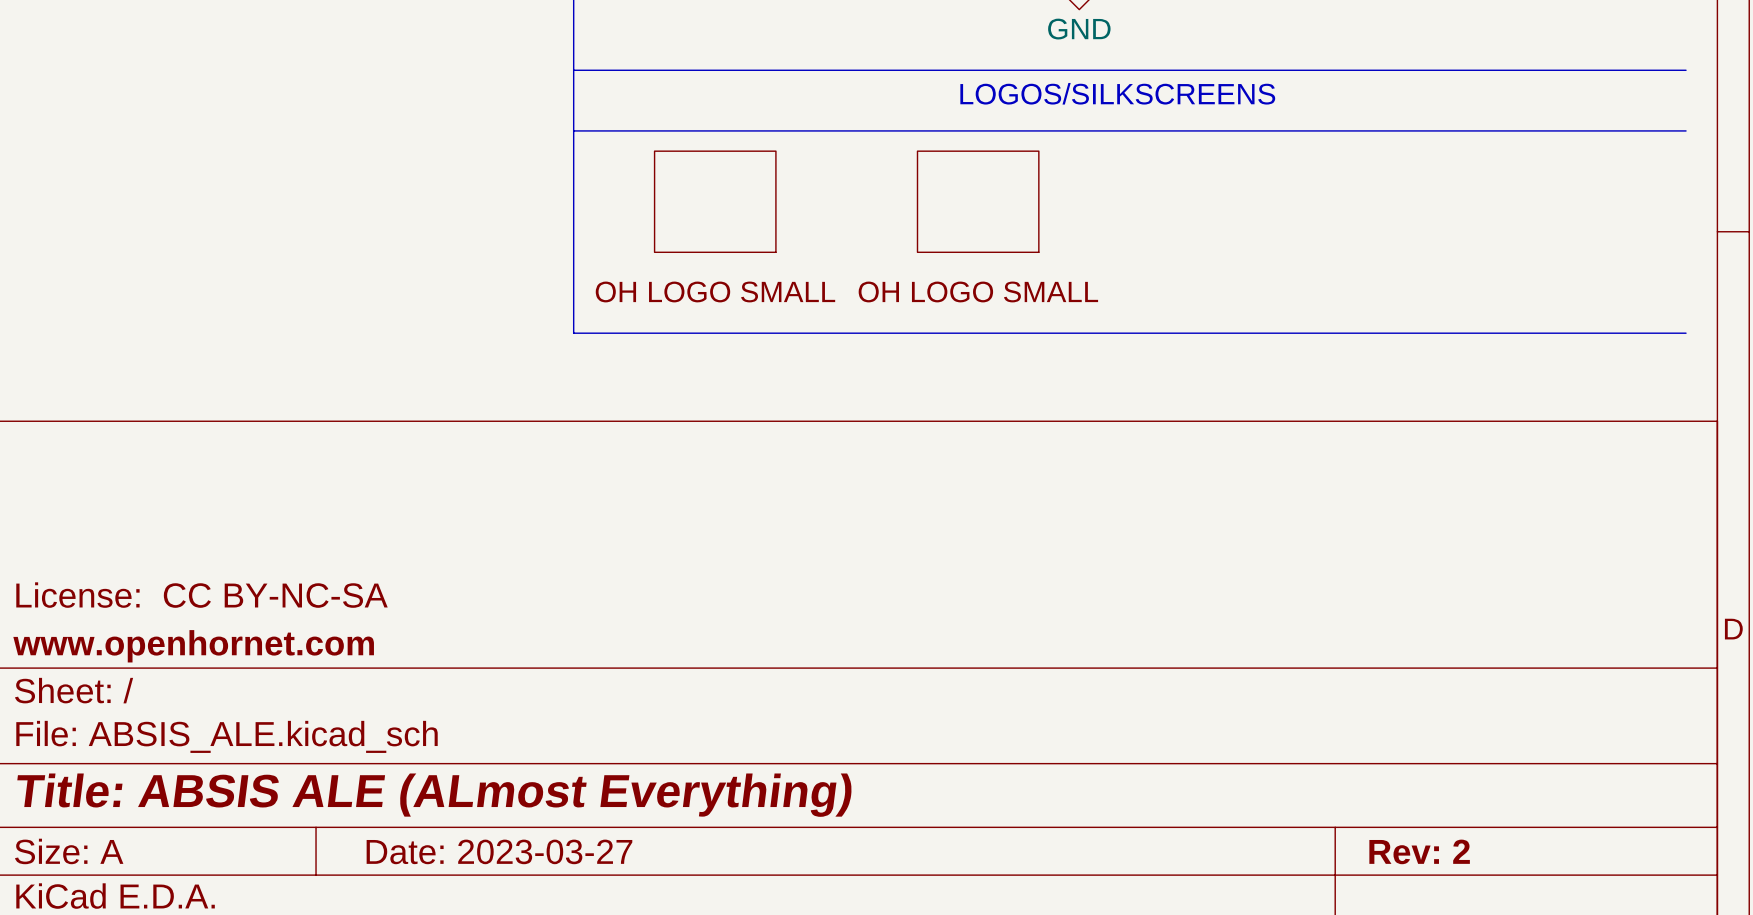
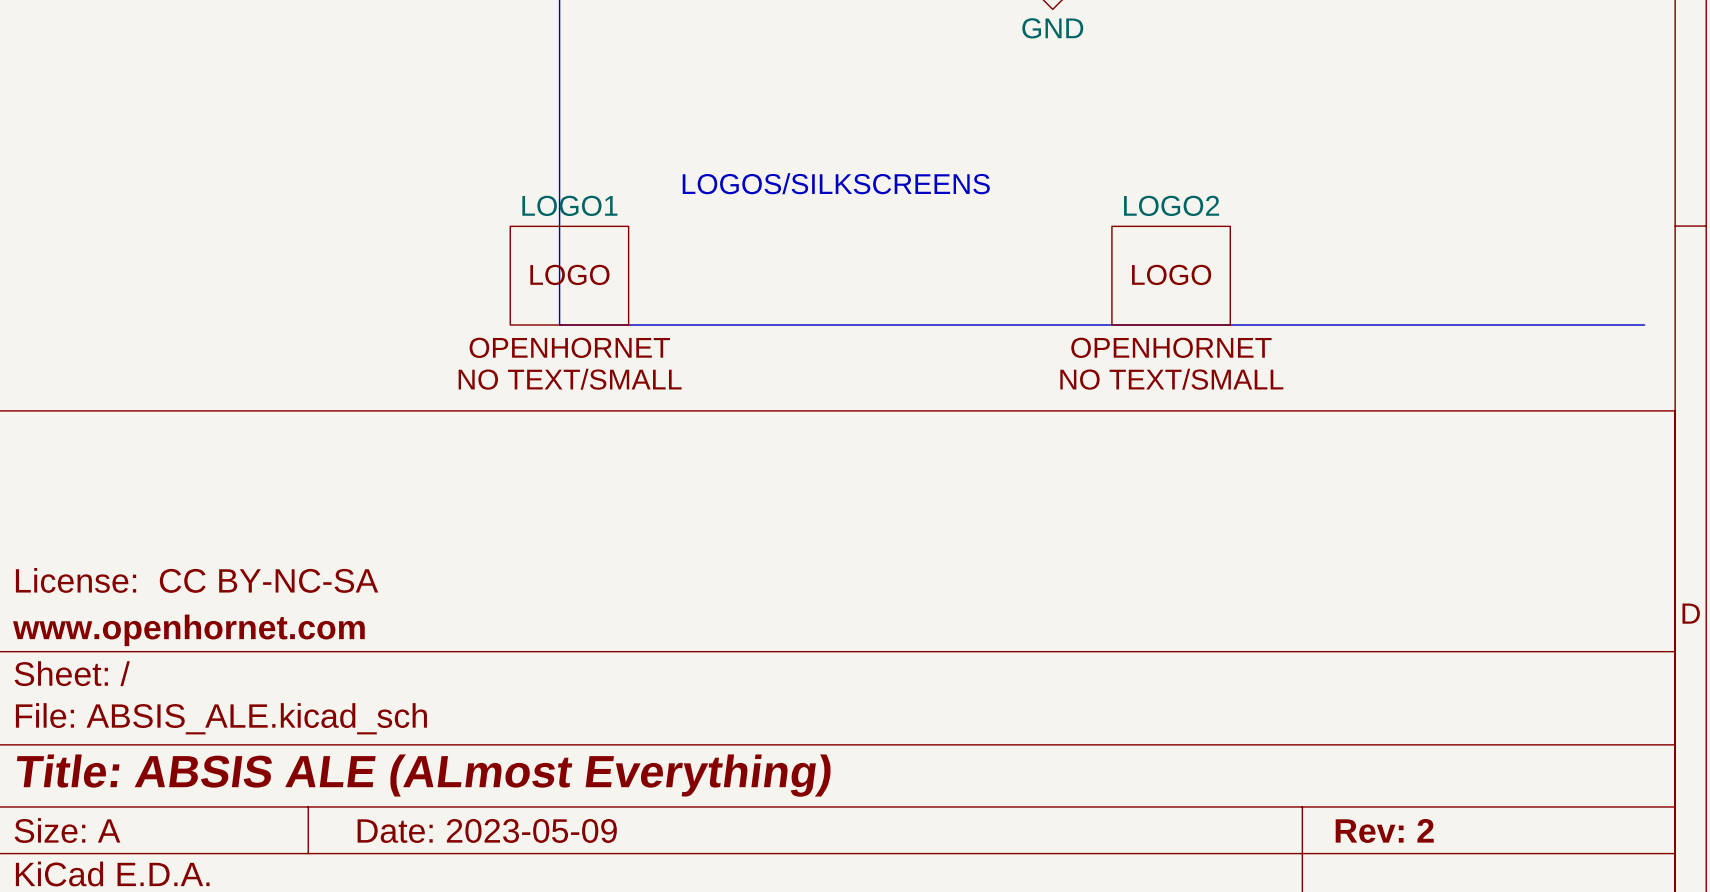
line: (573, 70) (1686, 70) -> none
text position: LOGOS/SILKSCREENS (1117, 93) -> LOGOS/SILKSCREENS (836, 183)
line: (573, 130) (1686, 130) -> none
part: (715, 201) -> none
part: (978, 201) -> none
LOGO1: none -> (569, 275)
LOGO2: none -> (1171, 275)
title block: Date: 2023-03-27 (499, 851) -> Date: 2023-05-09 (487, 830)

